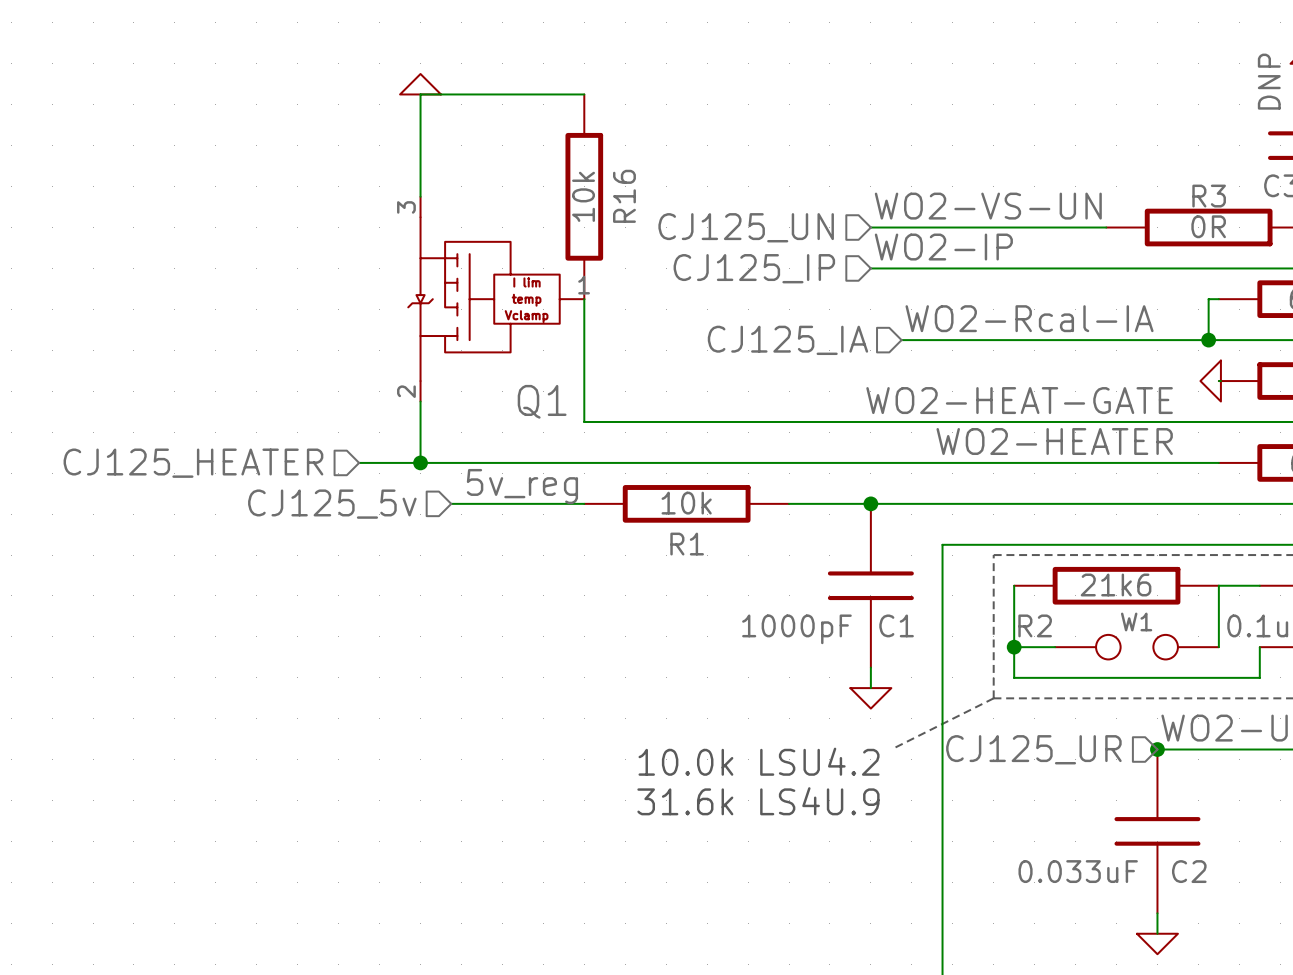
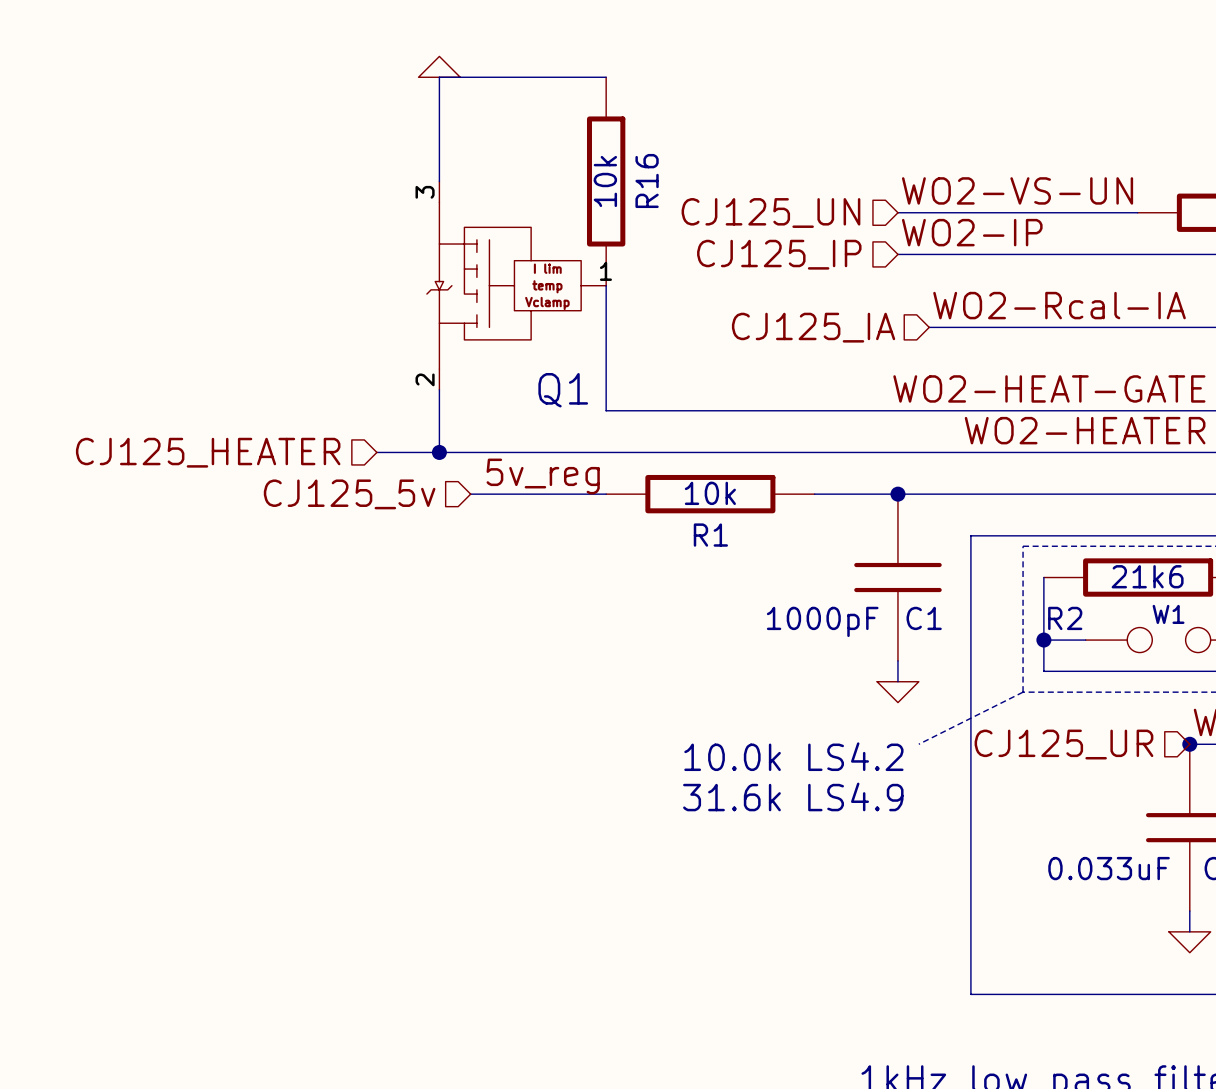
text: 10.0k LSU4.2 (759, 761) -> 10.0k LS4.2 (793, 756)
text: 31.6k LS4U.9 (758, 801) -> 31.6k LS4.9 (793, 796)

